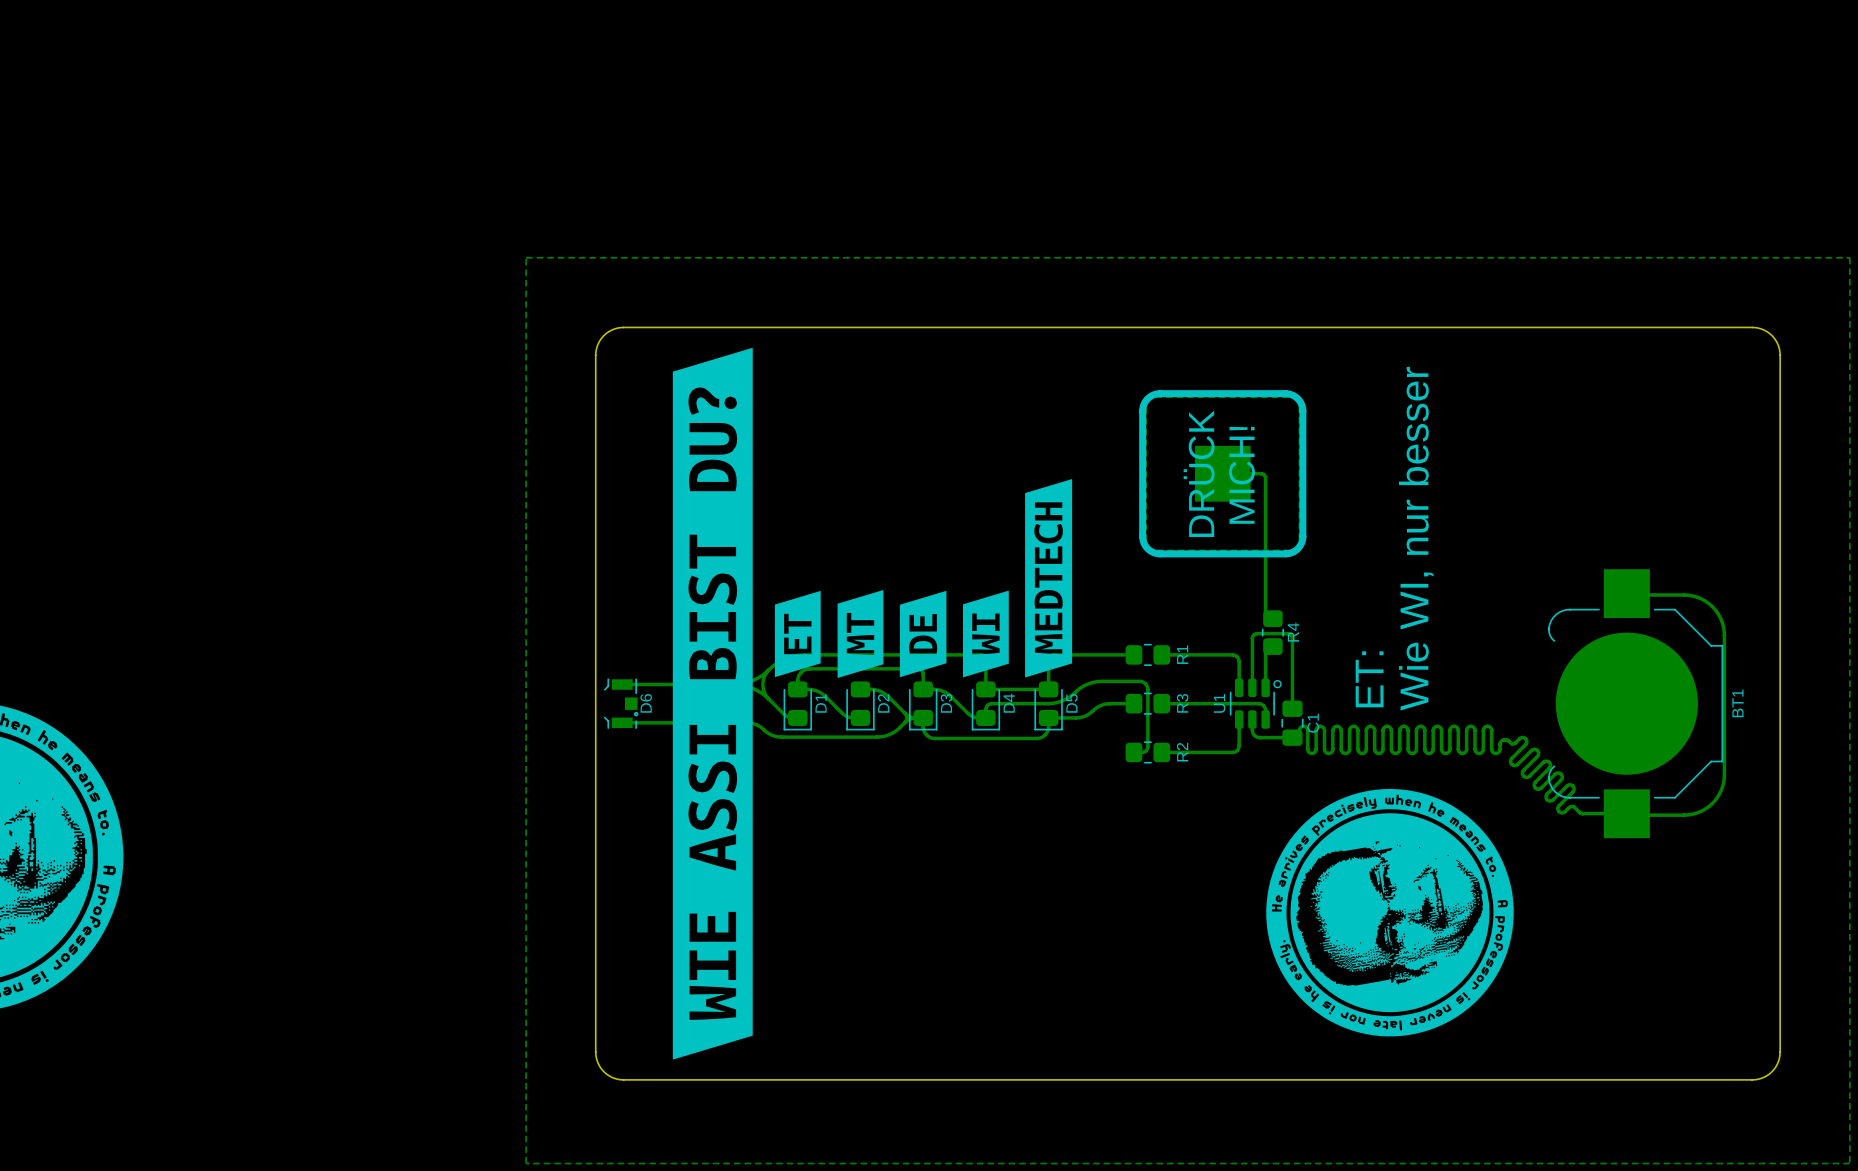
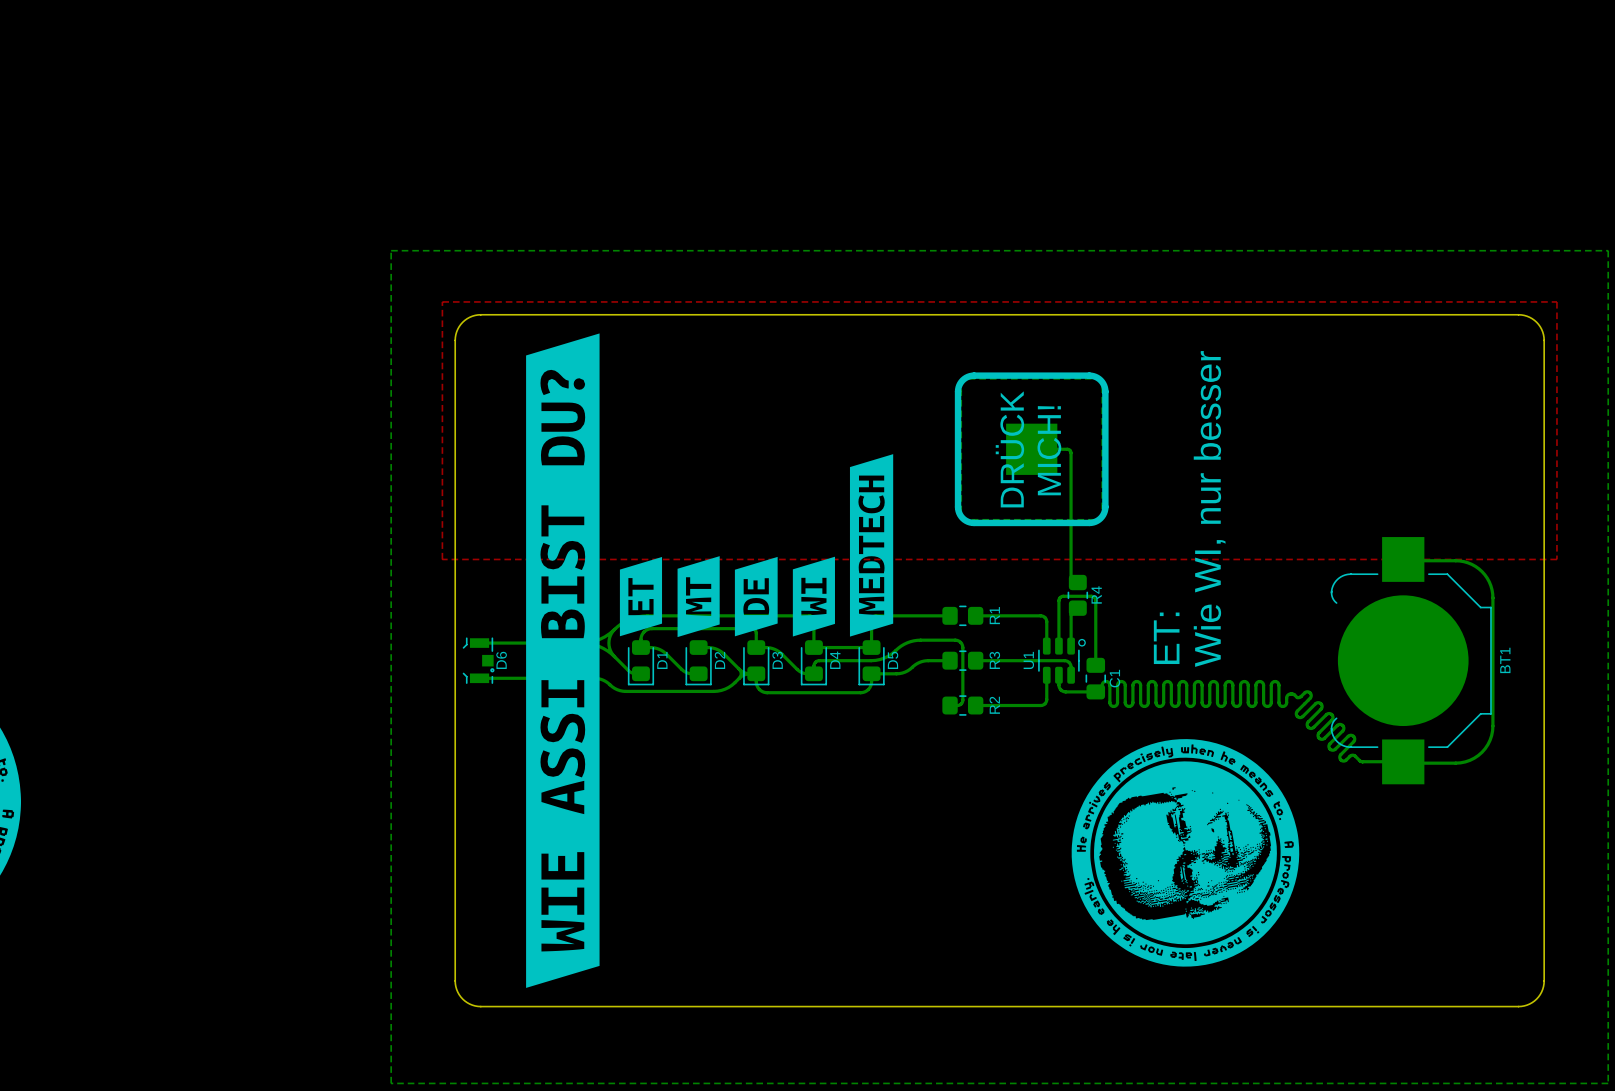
top zone outline: none -> (1556, 301) (1556, 559) (442, 559) (442, 301) (1556, 301)

